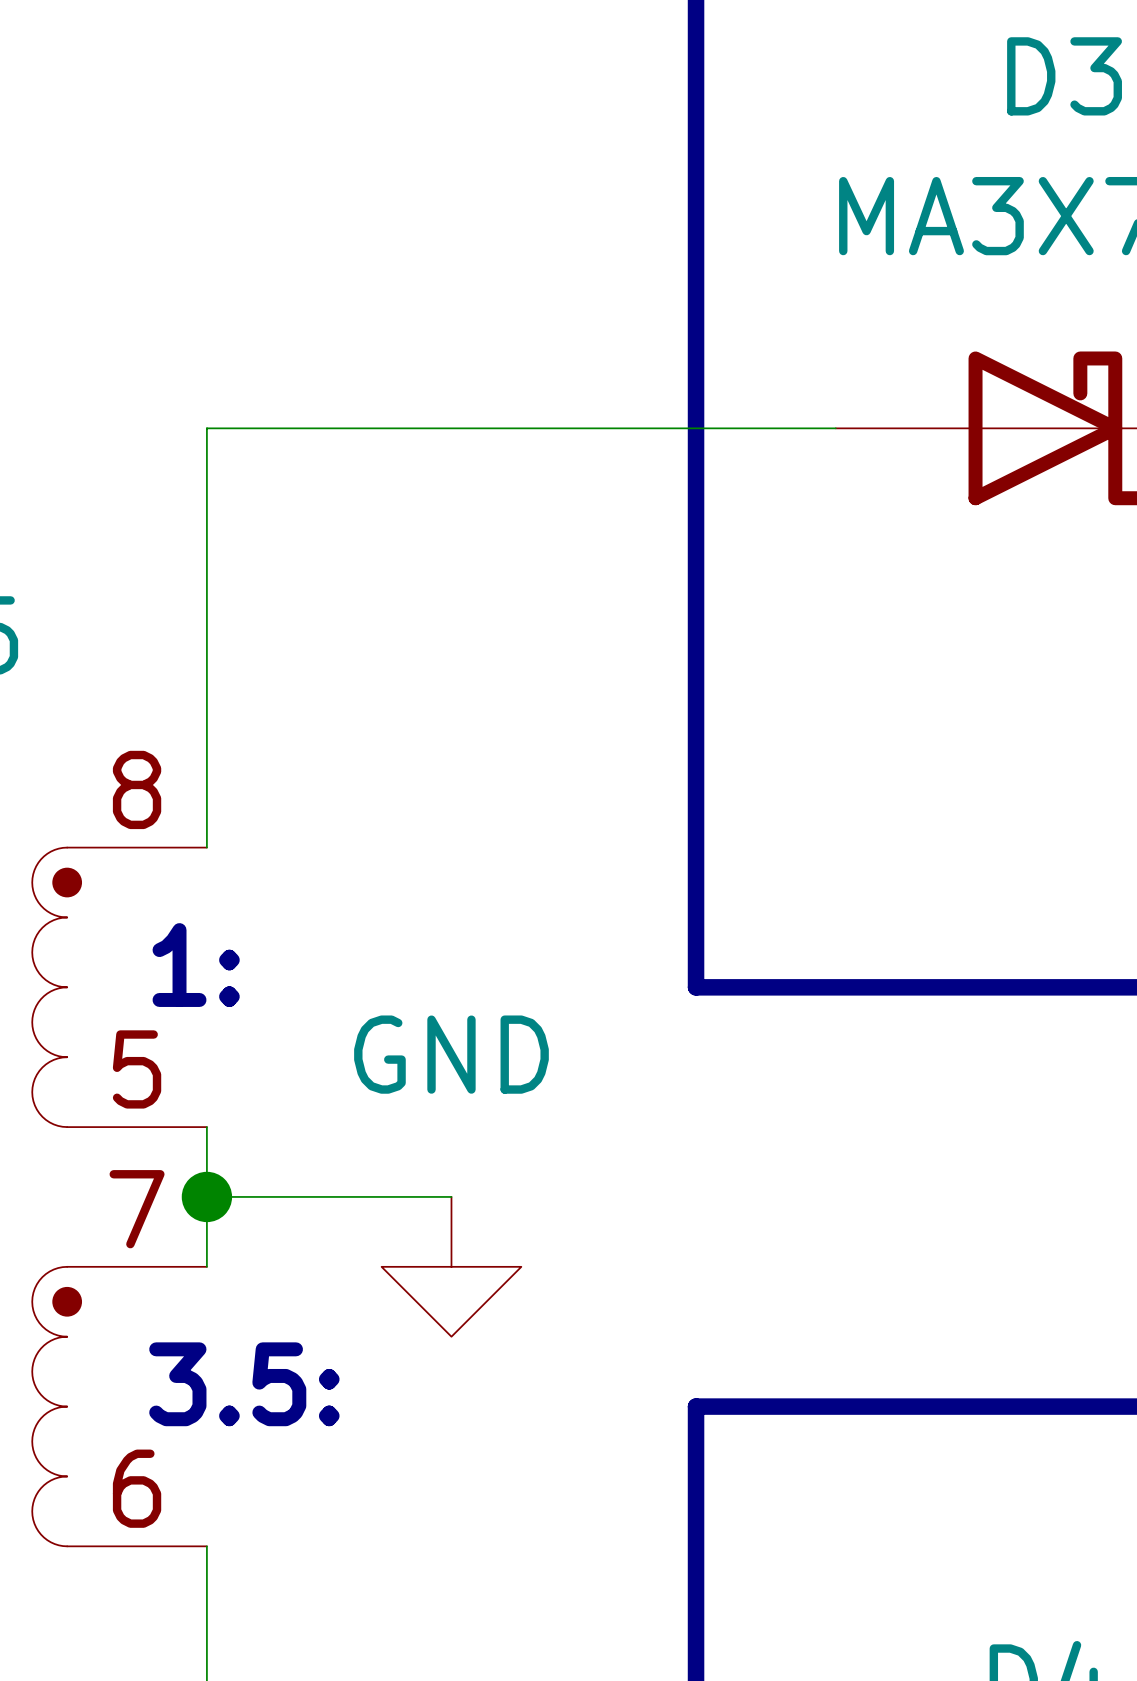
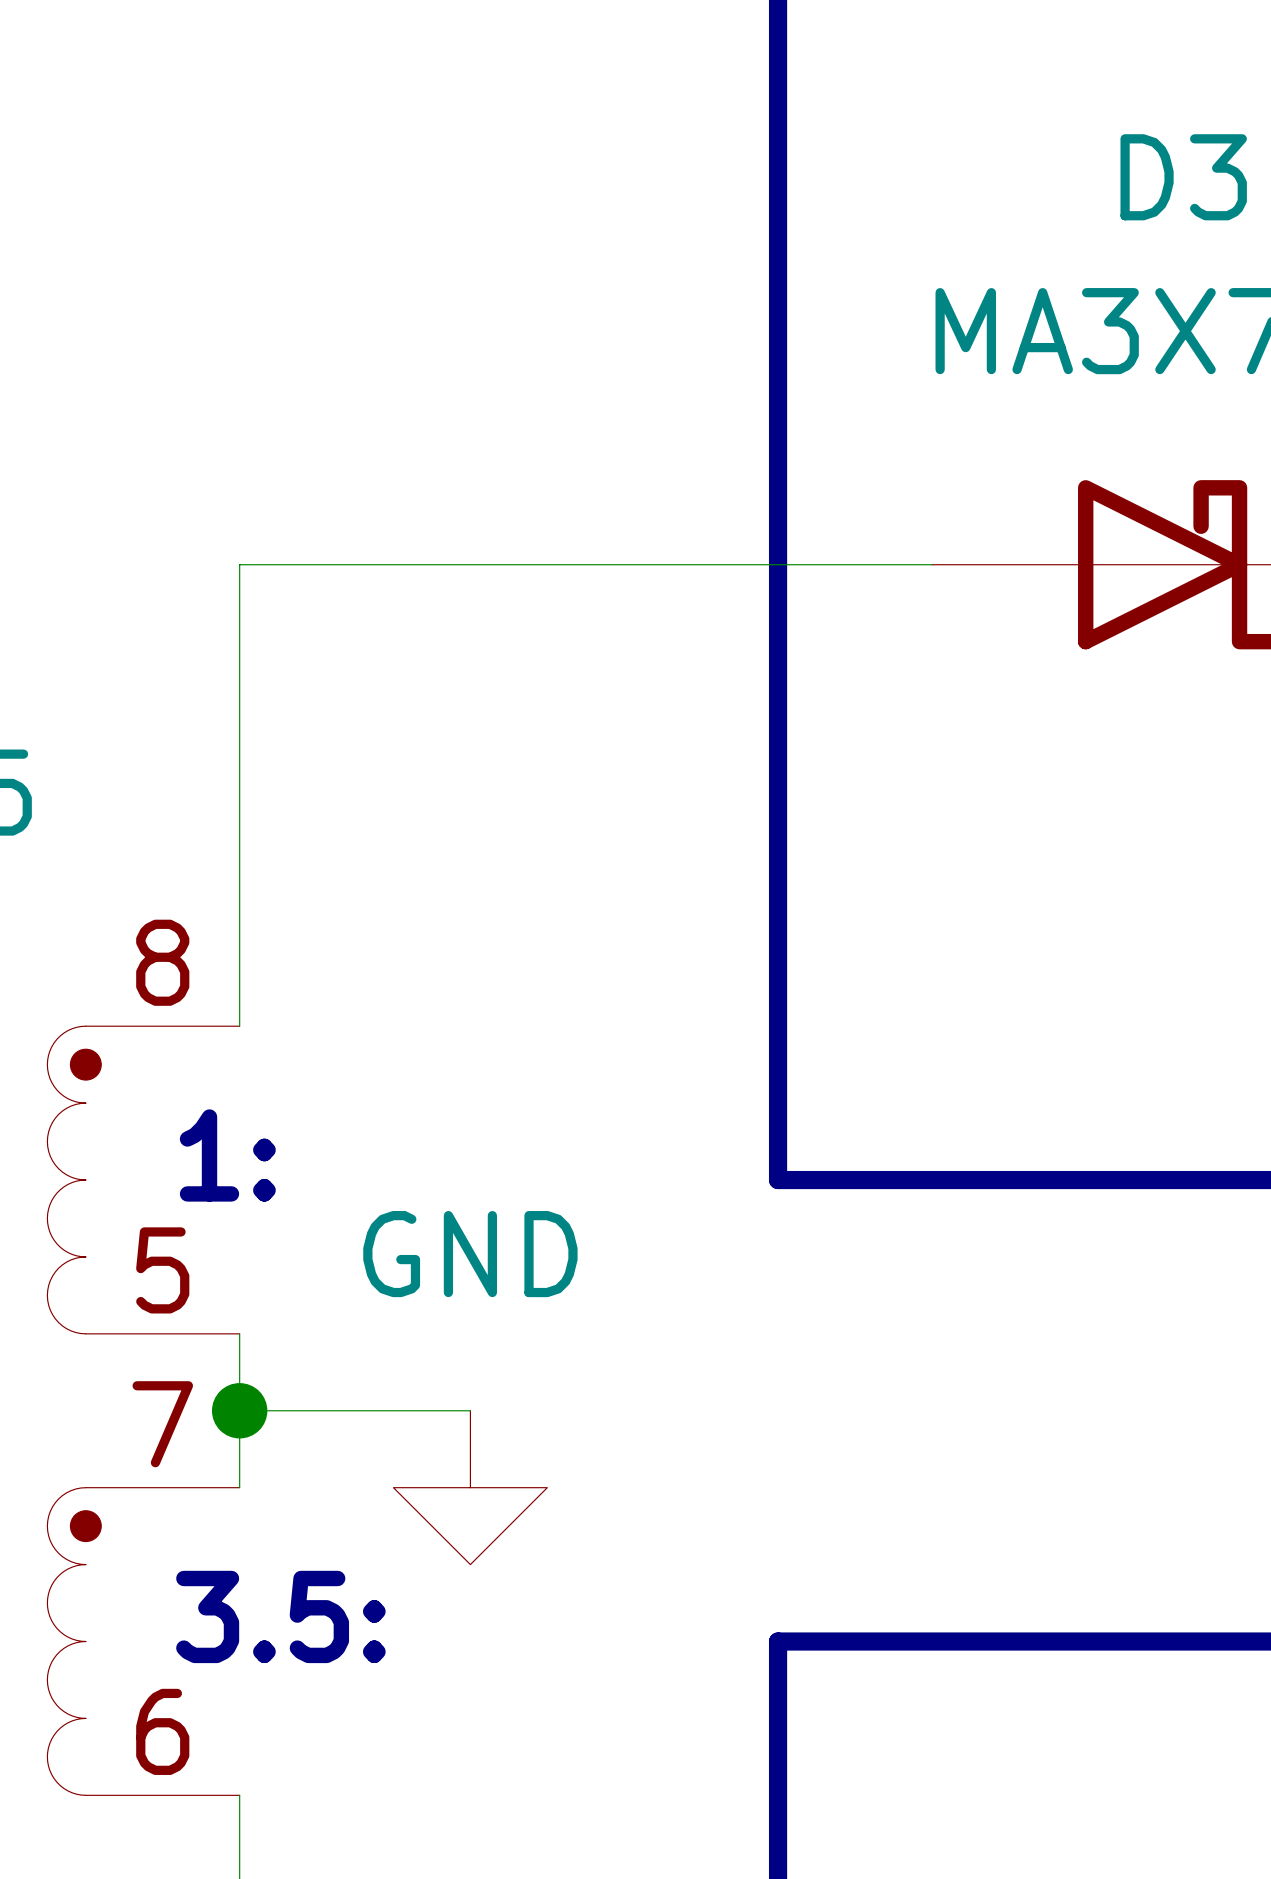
wire: (416, 1196) (451, 1196) -> none
power symbol position: GND (451, 1266) -> GND (470, 1487)

